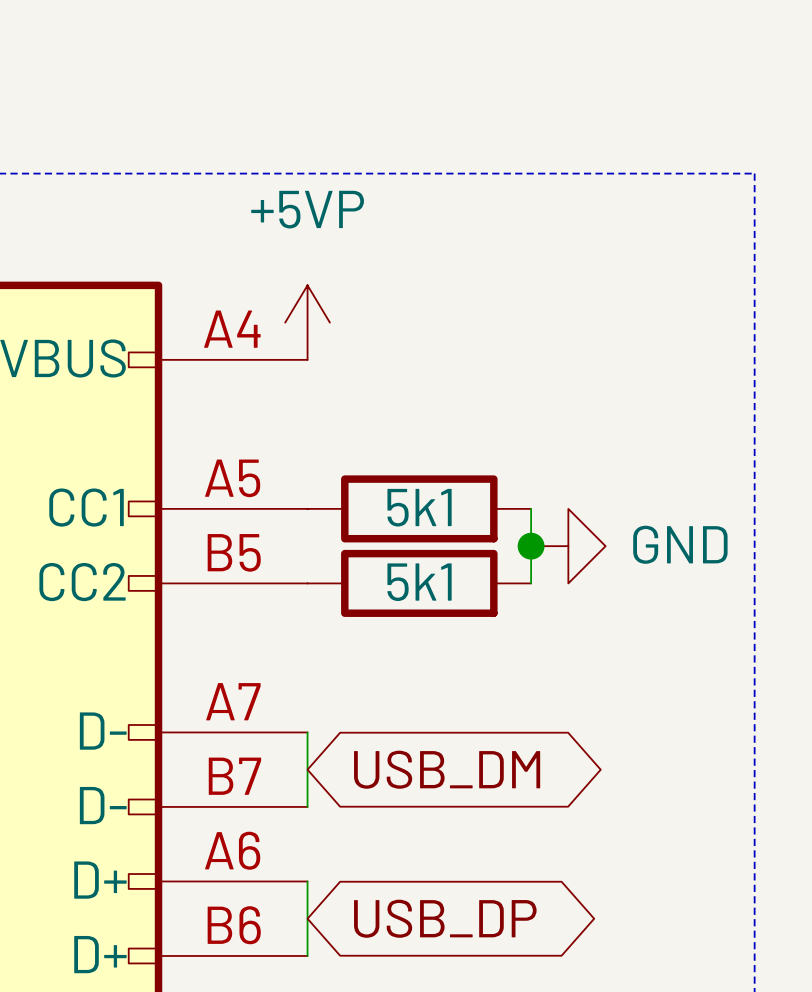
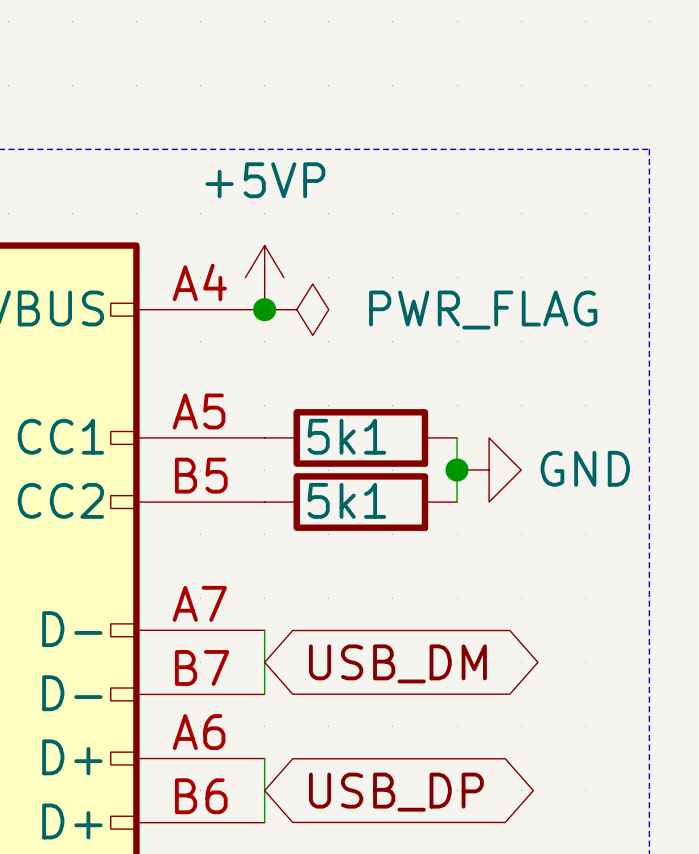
junction: none -> (264, 309)
power symbol: none -> PWR_FLAG (296, 309)

